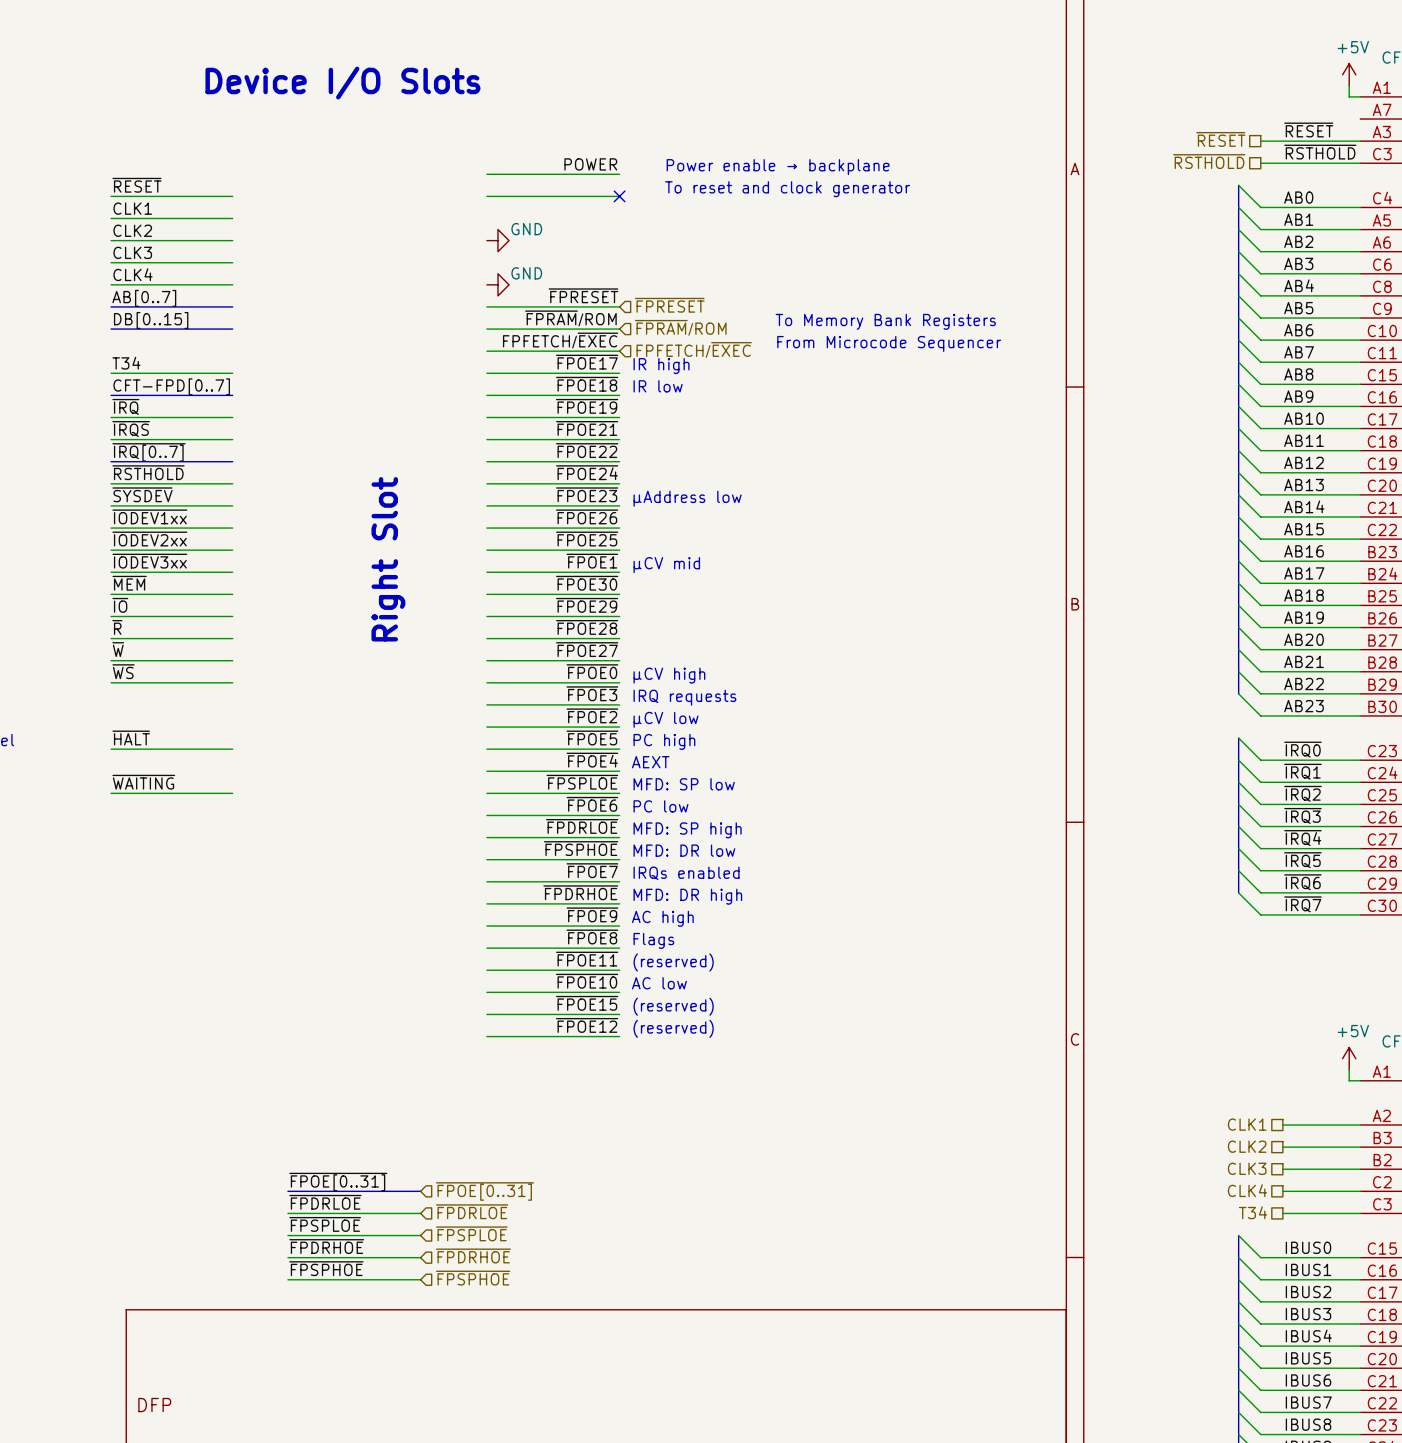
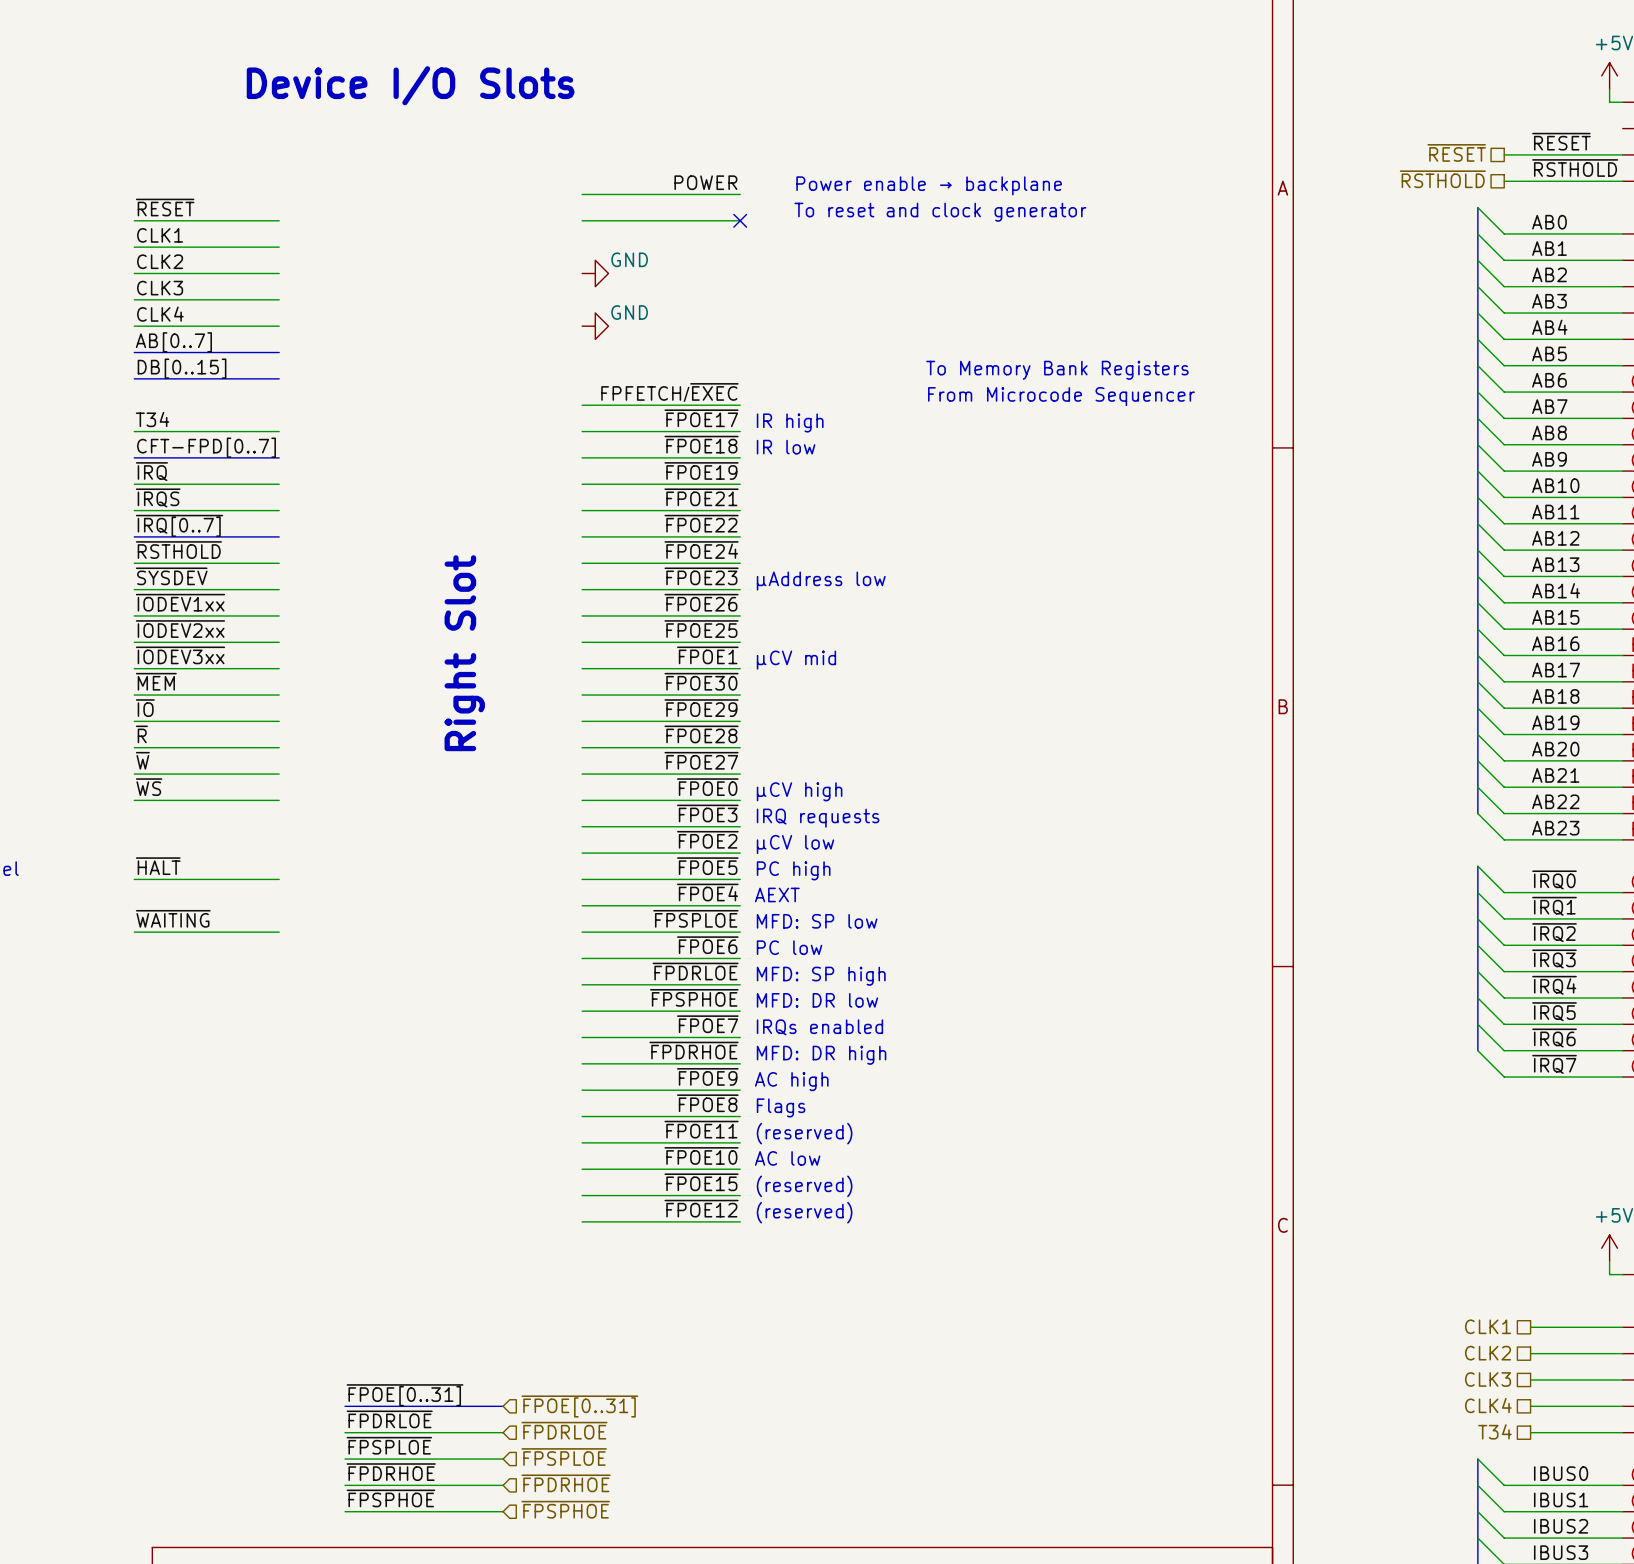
label: ~{FPRESET} (583, 295) -> none
hierarchical label: ~{FPRESET} (669, 305) -> none
wire: (486, 306) (619, 306) -> none
label: ~{FPRAM}∕ROM (570, 318) -> none
hierarchical label: ~{FPRAM}∕ROM (680, 328) -> none
wire: (486, 329) (619, 329) -> none
hierarchical label: FPFETCH∕~{EXEC} (694, 350) -> none

